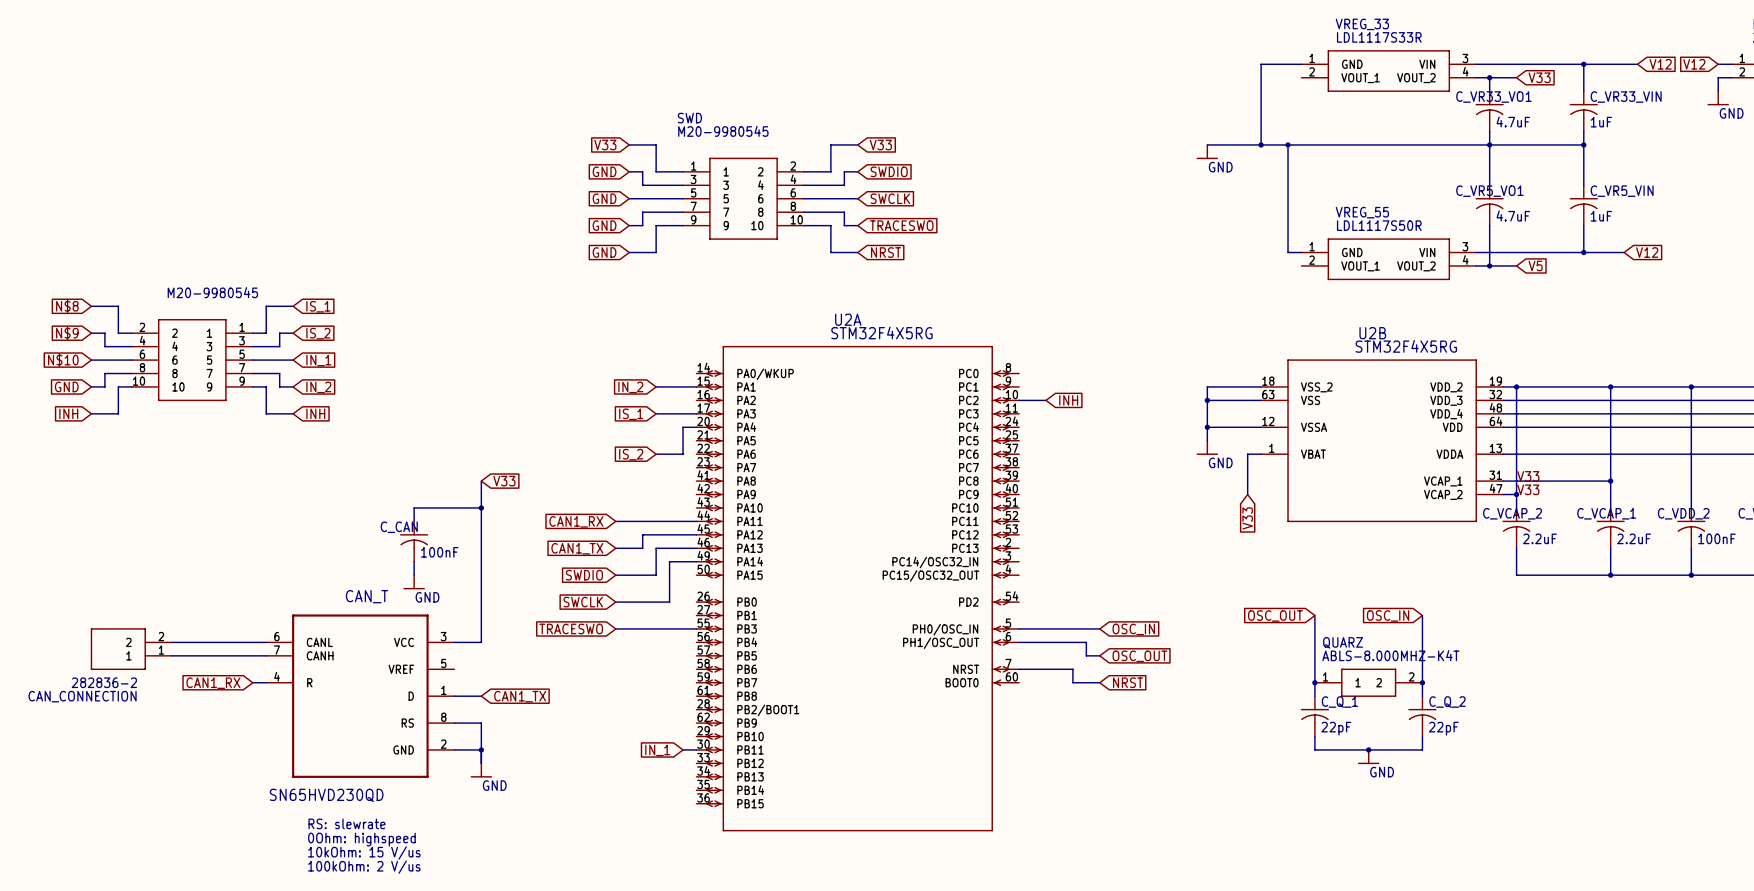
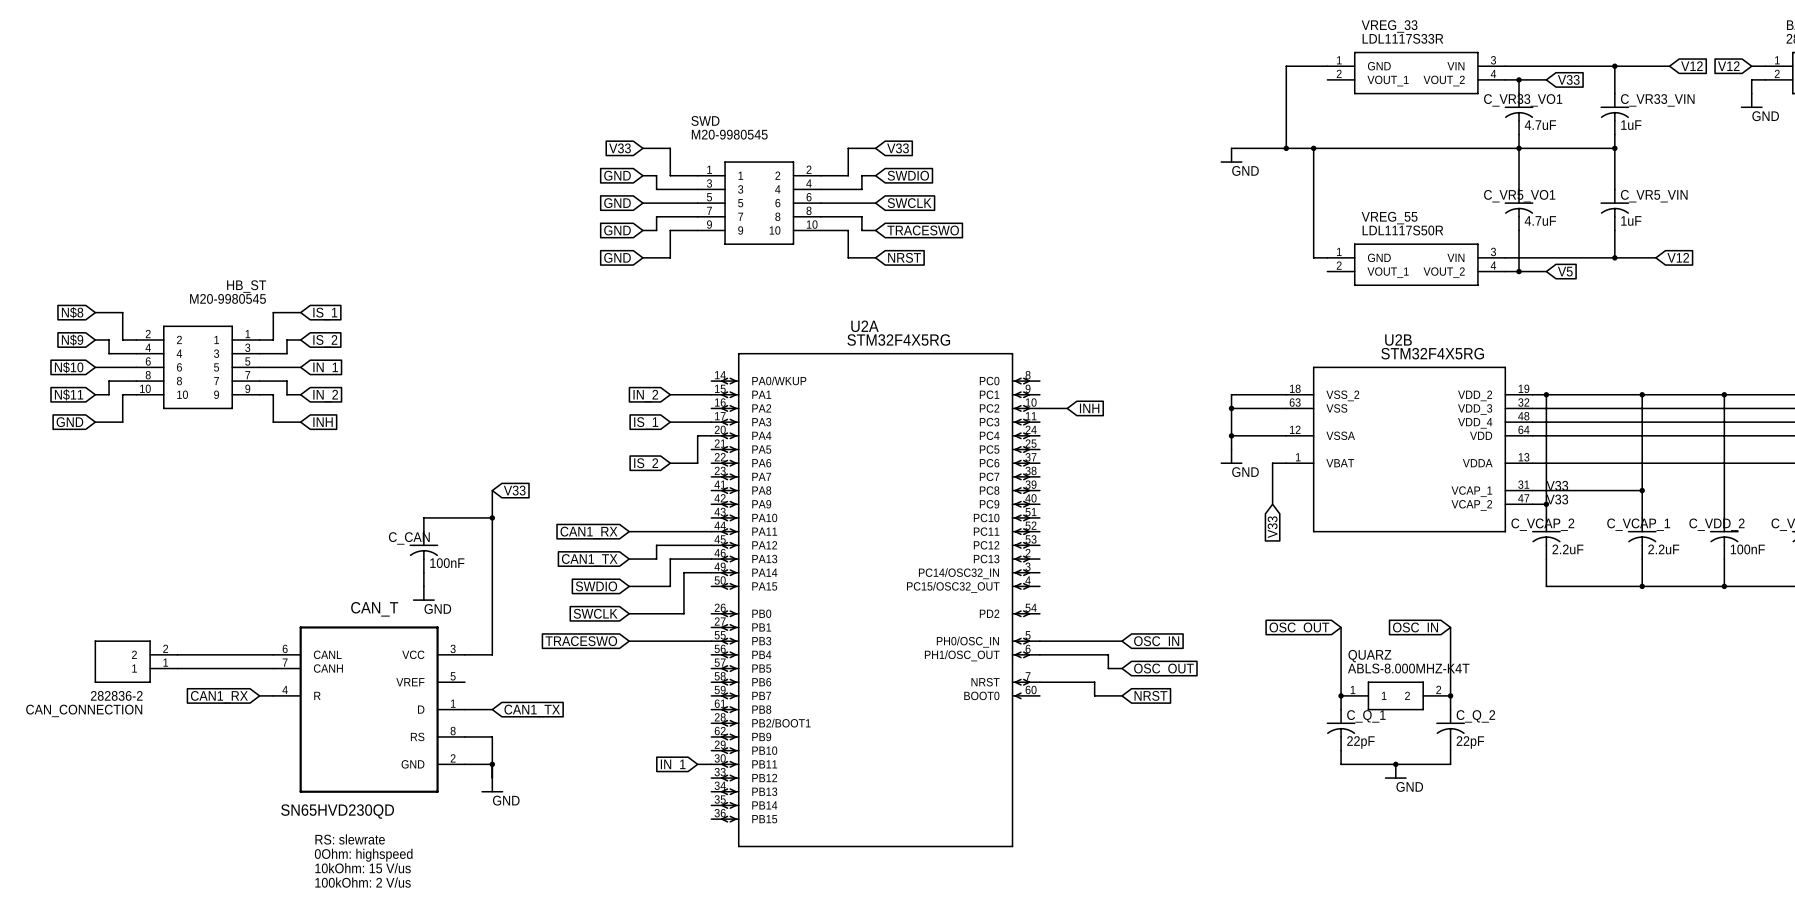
HB_ST name: none -> HB_ST (246, 286)
global label: GND (66, 386) -> N$11 (69, 394)
global label: INH (68, 413) -> GND (69, 422)

